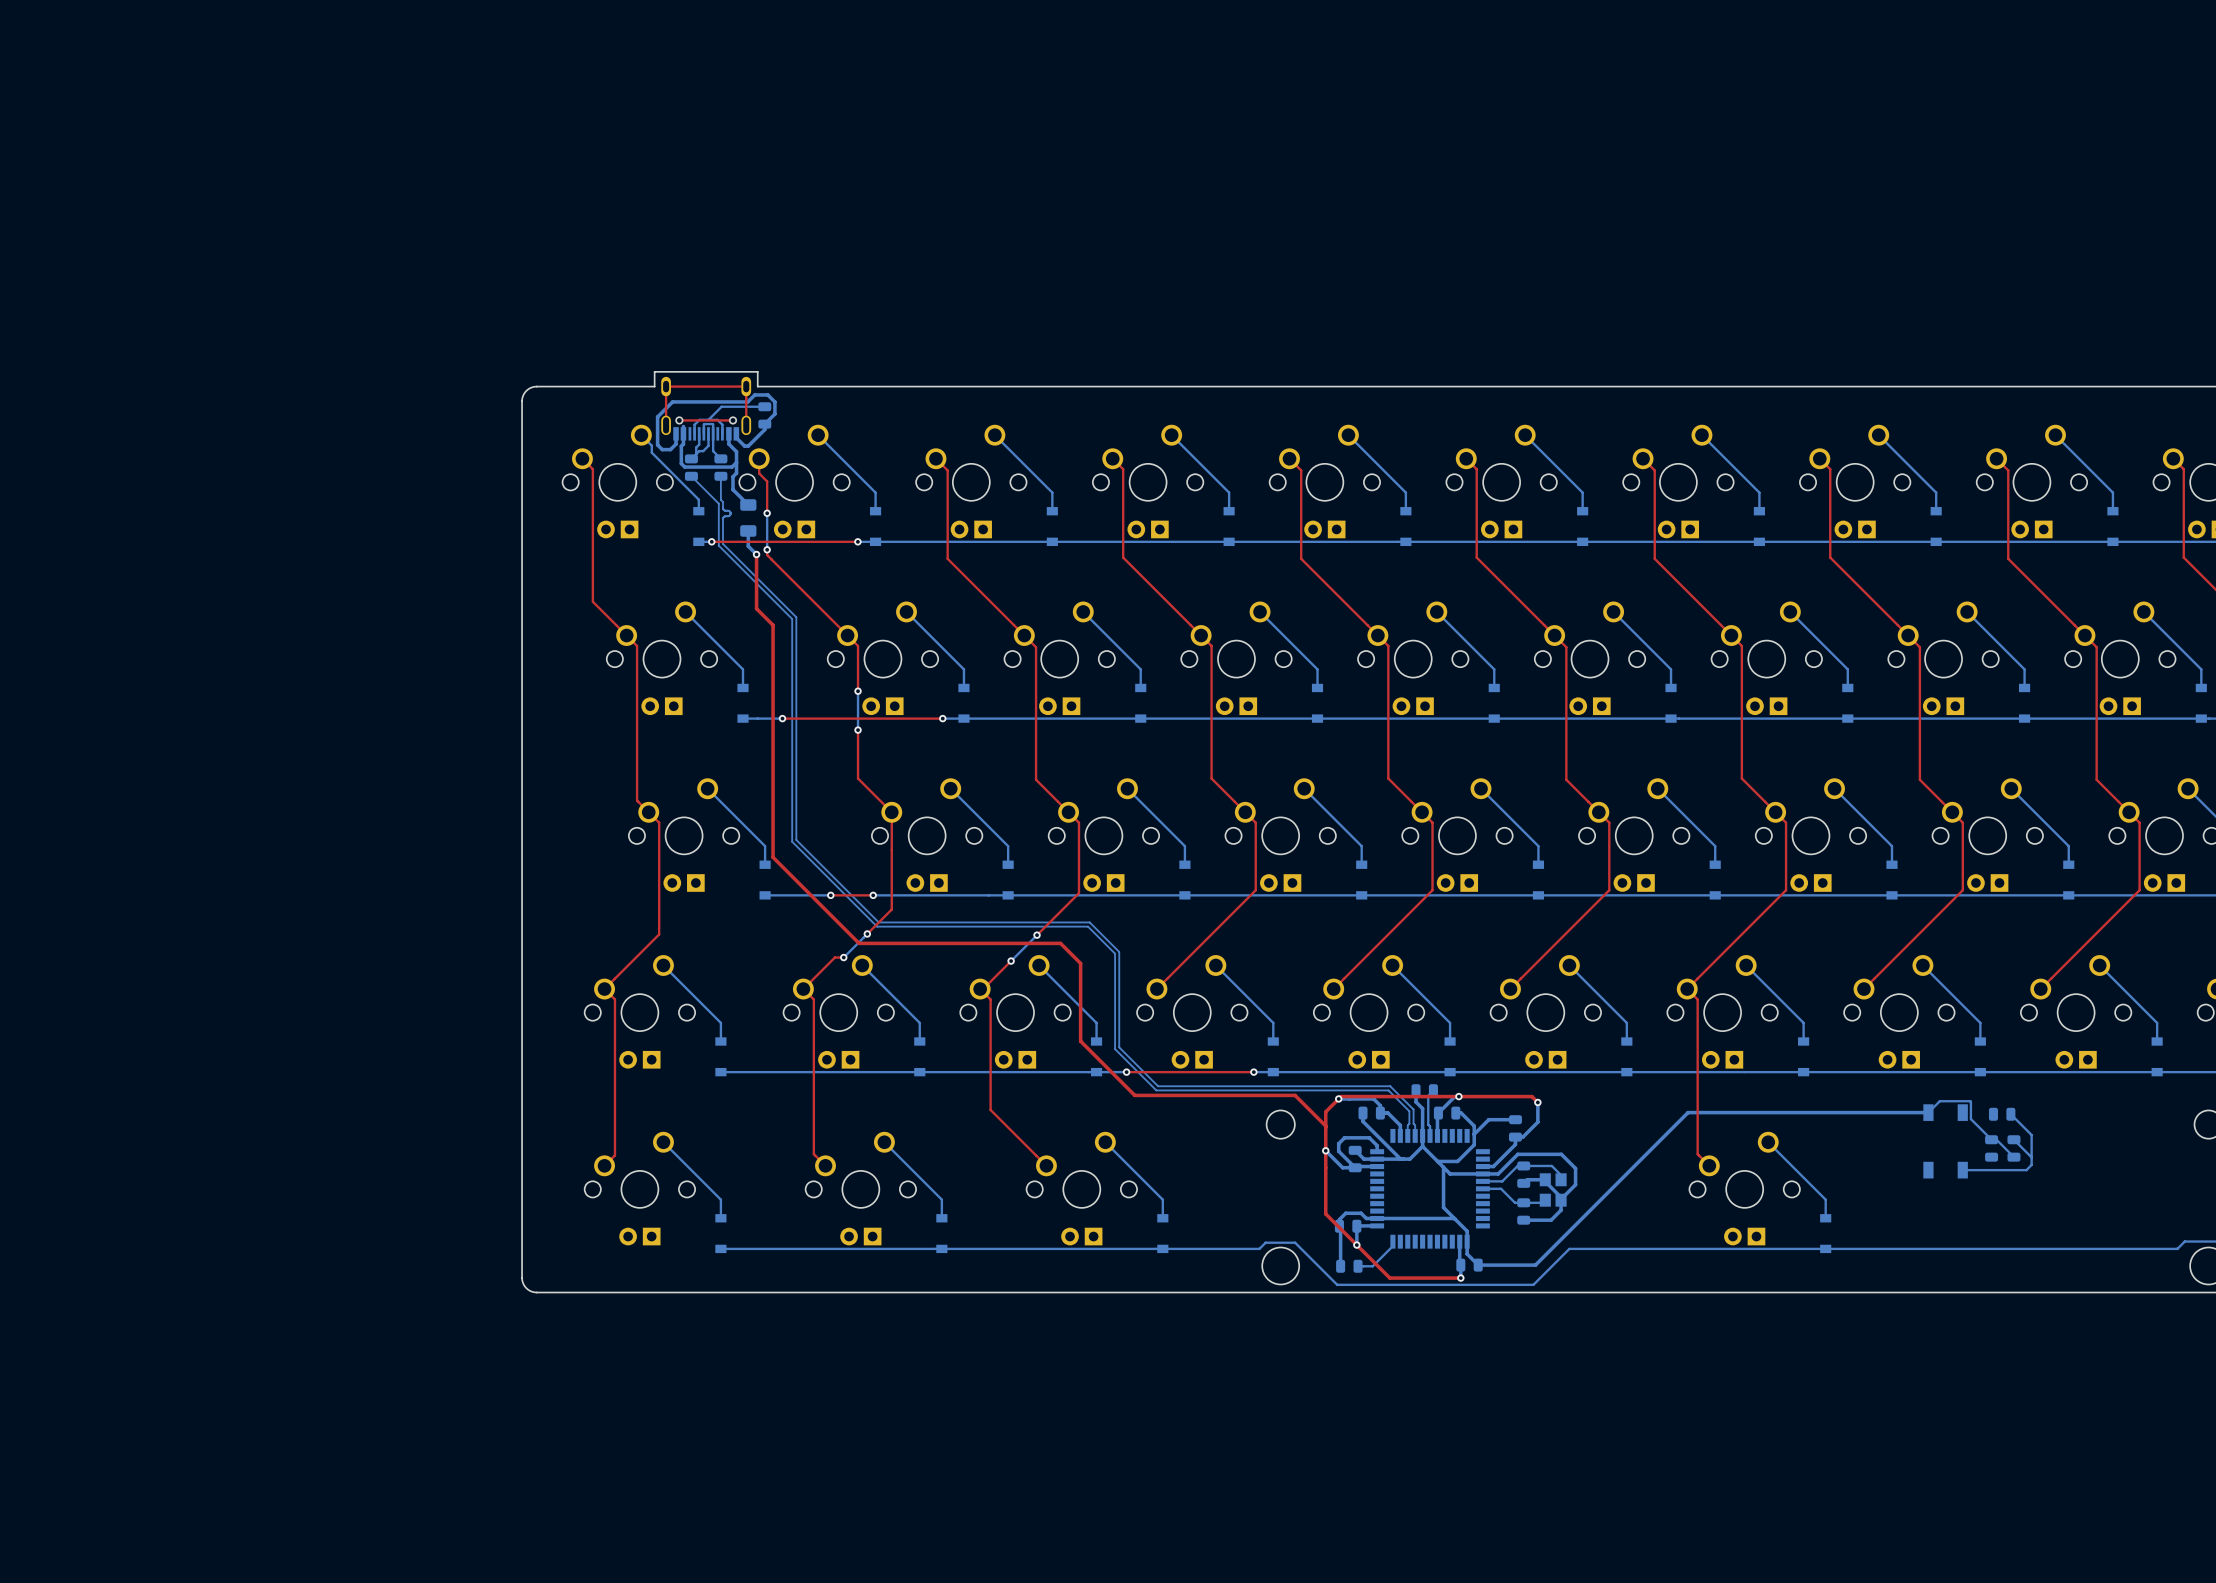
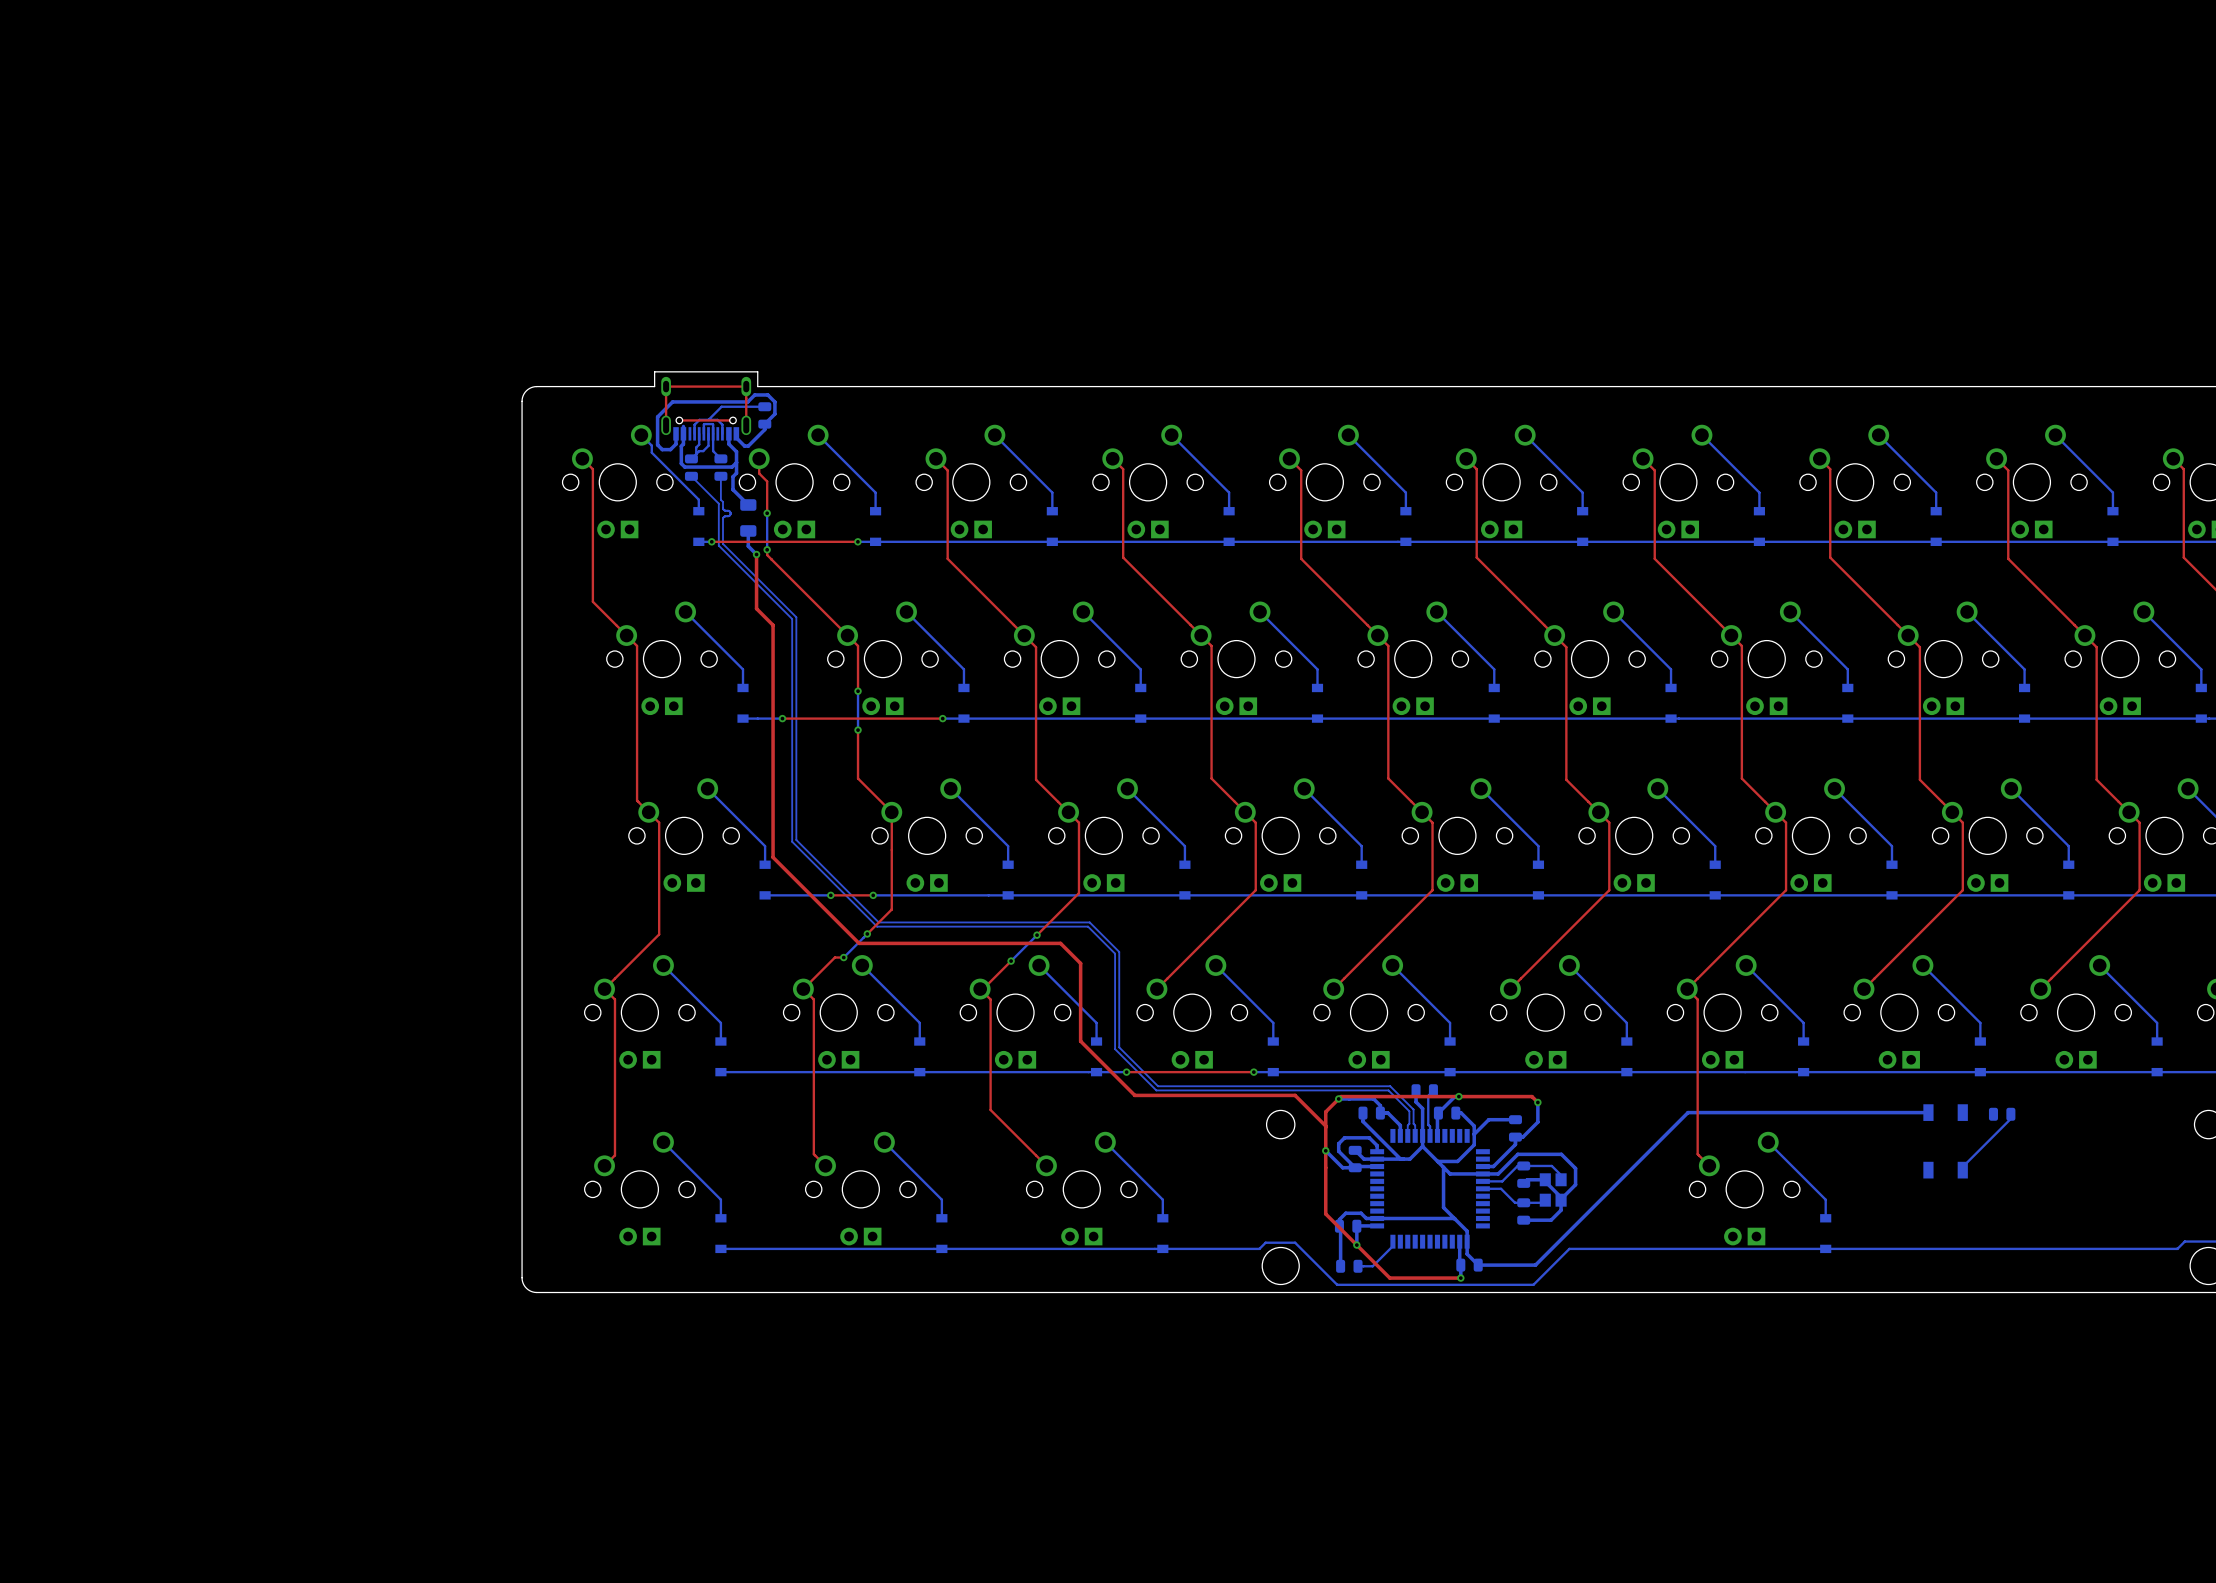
bottom track: (1931, 1109) (1939, 1101) (1970, 1101) (1970, 1119) (1991, 1139) (1996, 1139) (2013, 1157) -> none
bottom track: (2010, 1114) (2031, 1135) (2031, 1164) (2026, 1170) (1962, 1170) -> none
bottom track: none -> (2010, 1118) (1962, 1166)
bottom track: (2013, 1139) (2031, 1157) -> none
part: (1991, 1148) -> none
part: (2013, 1148) -> none

